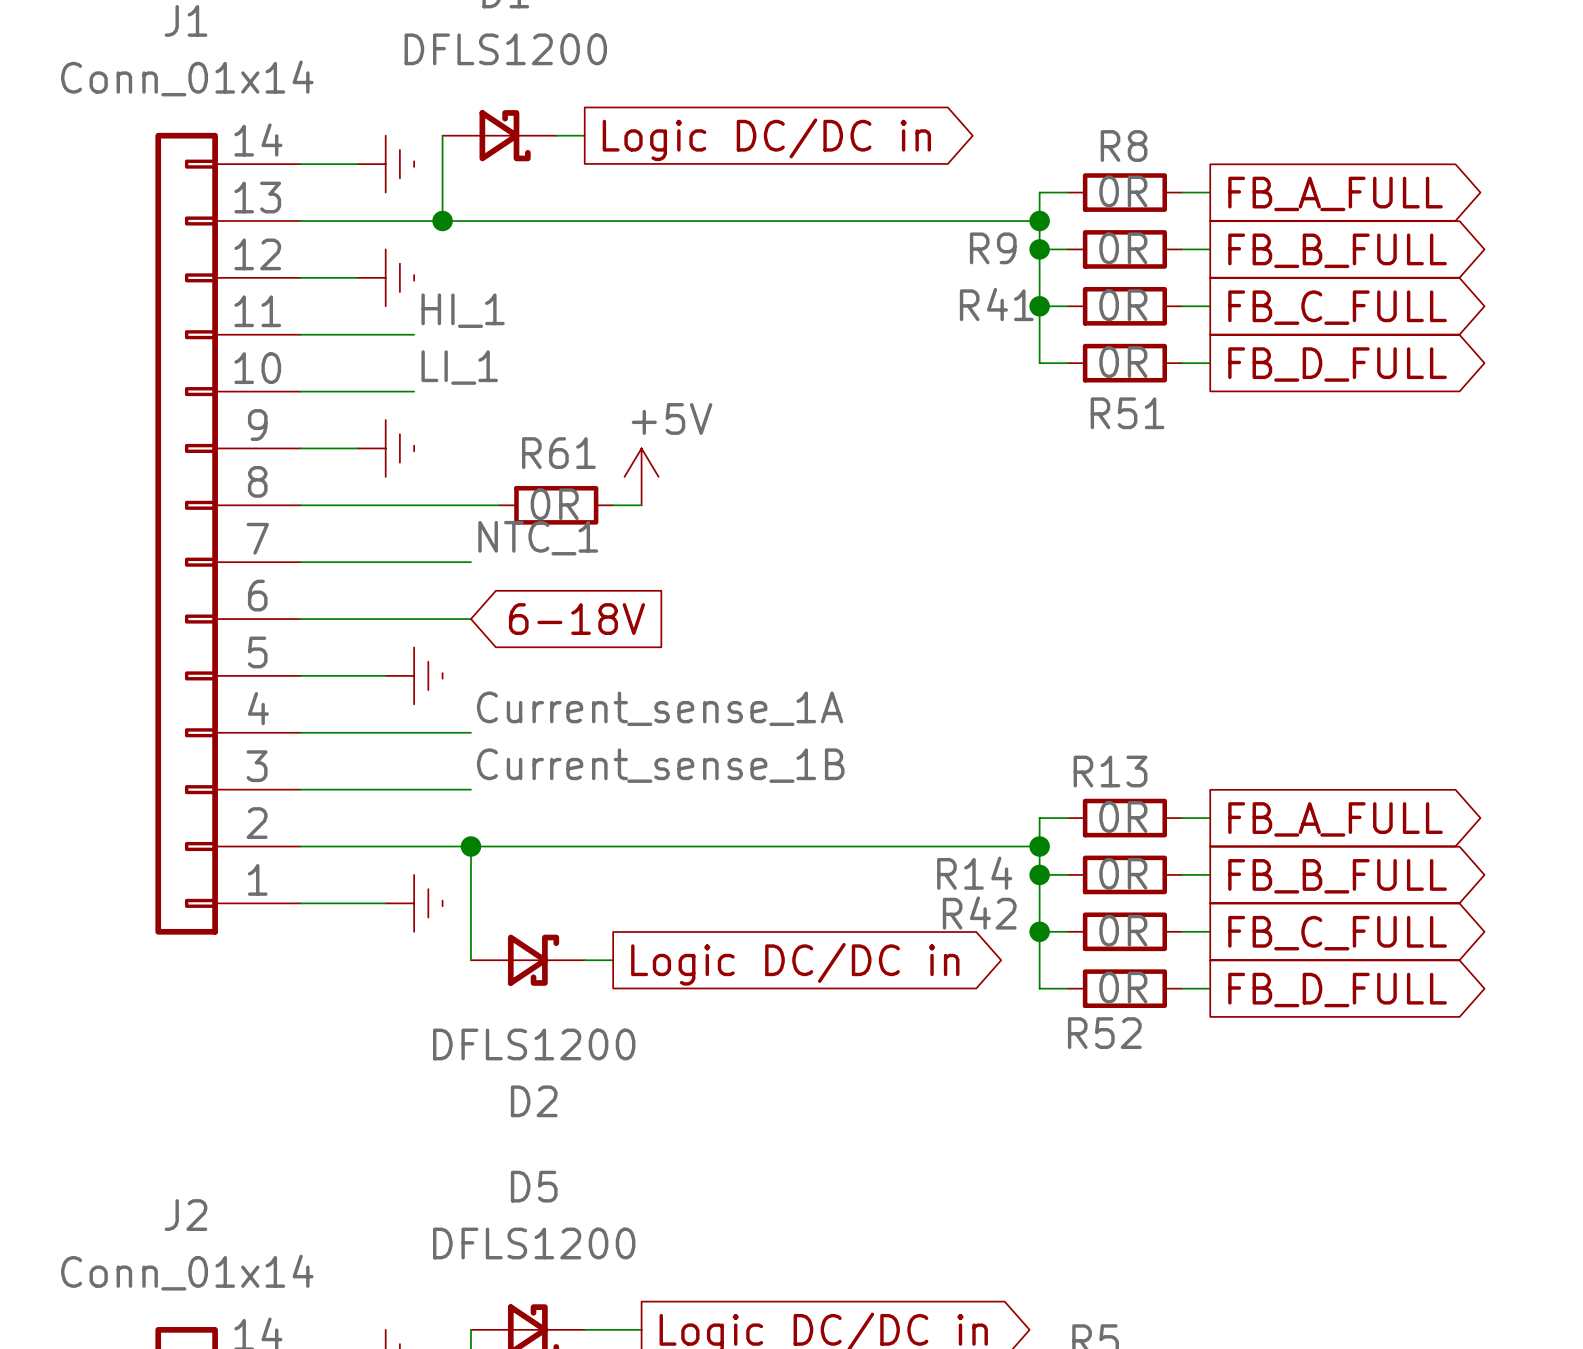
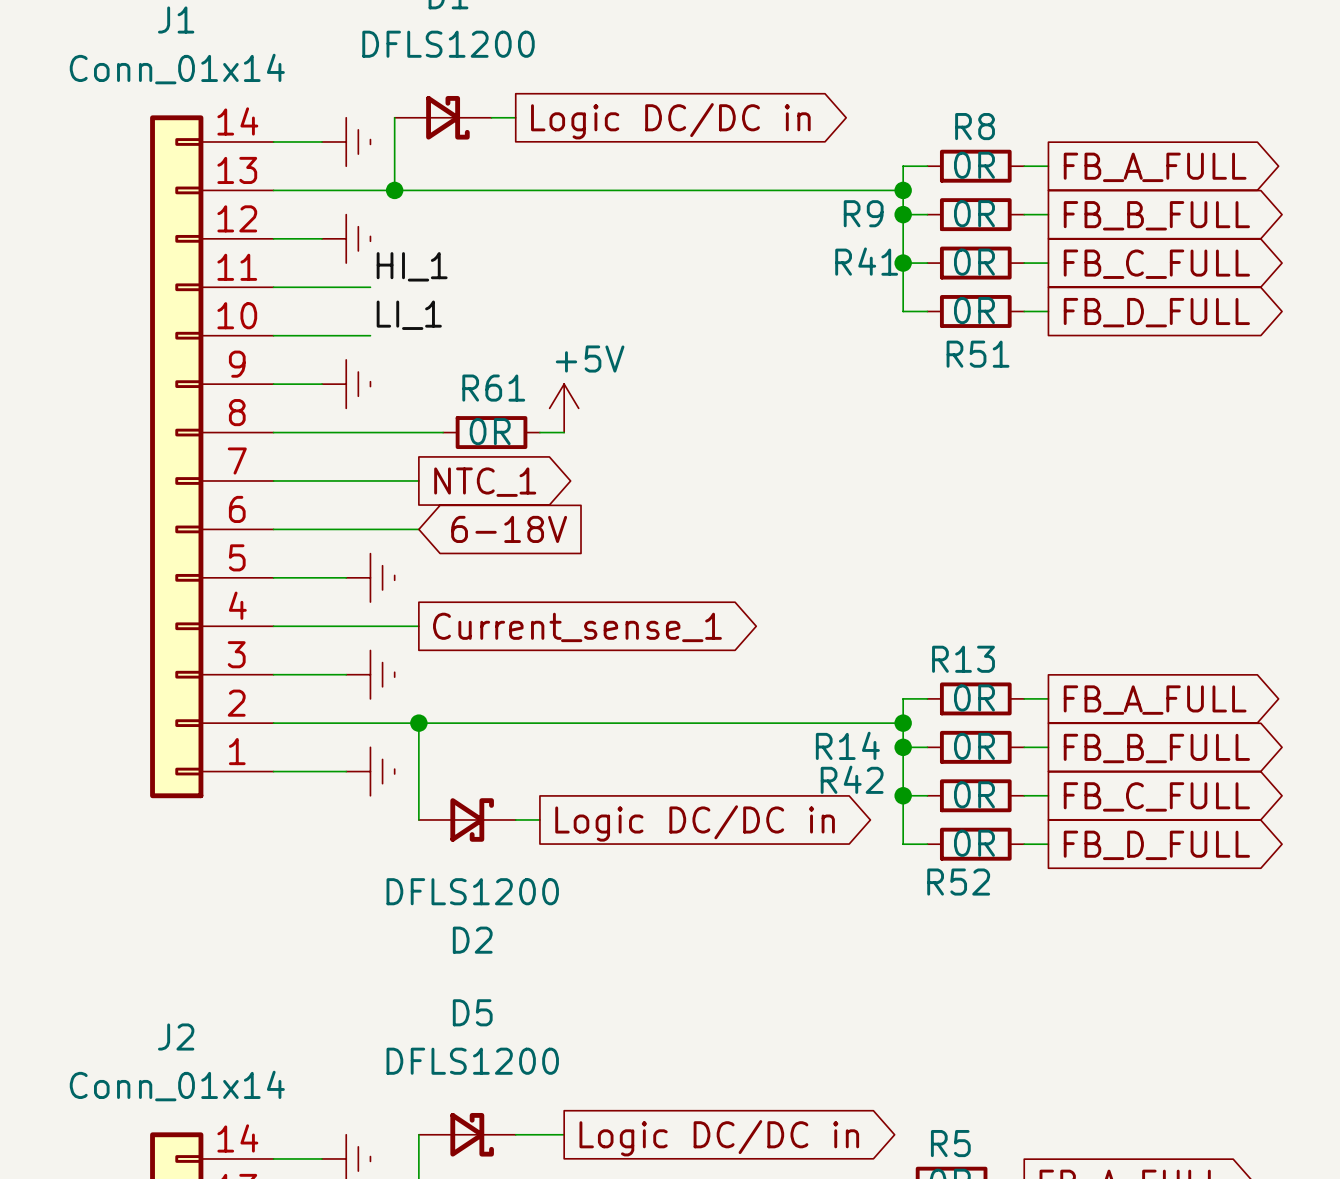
label: NTC_1 (538, 538) -> none
global label: none -> NTC_1 (485, 482)
label: Current_sense_1A (660, 708) -> none
global label: none -> Current_sense_1 (577, 627)
label: Current_sense_1B (660, 765) -> none
wire: (385, 789) (470, 789) -> none
power symbol: none -> (370, 674)

